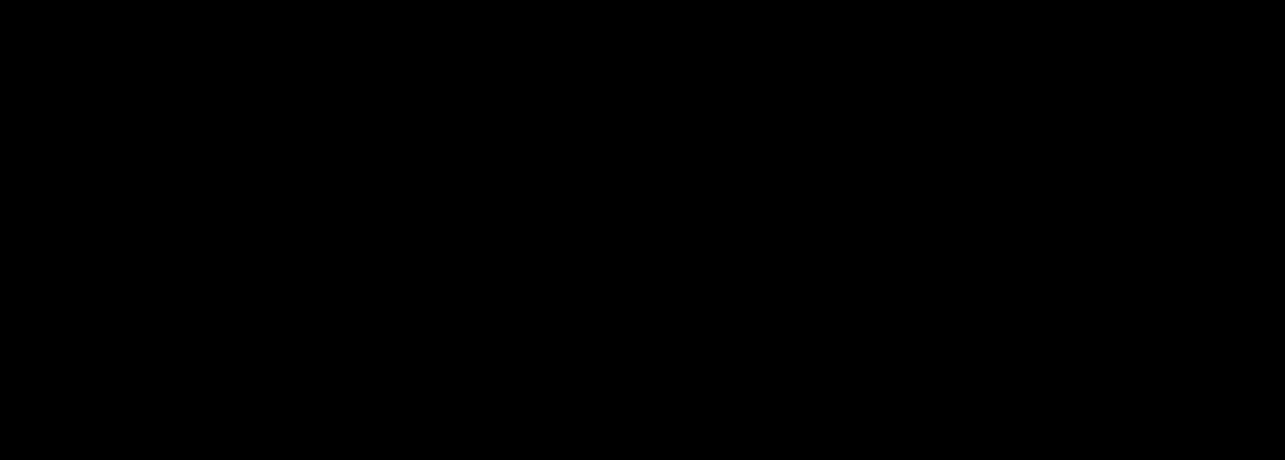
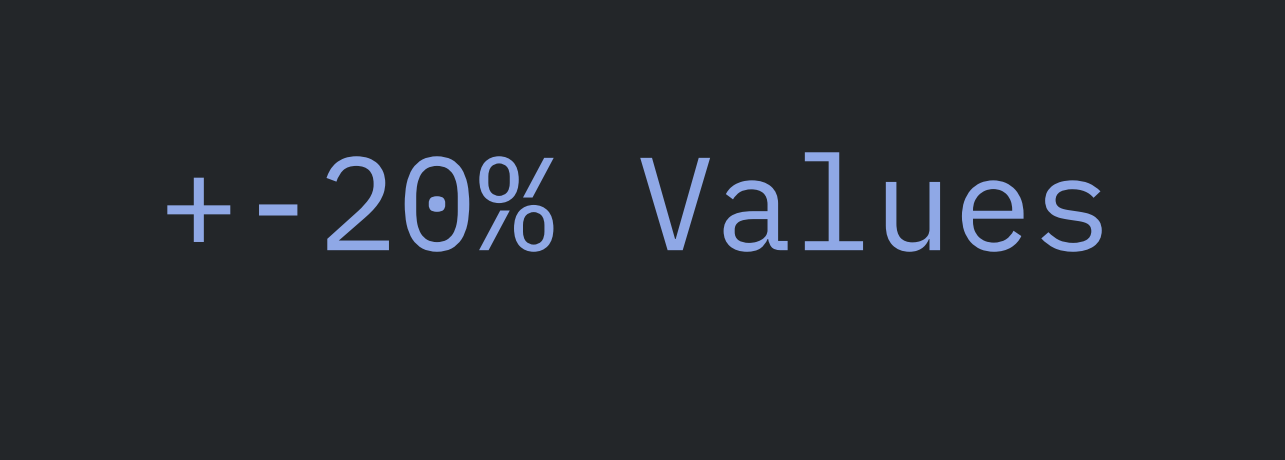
text: none -> +-20% Values (634, 202)

